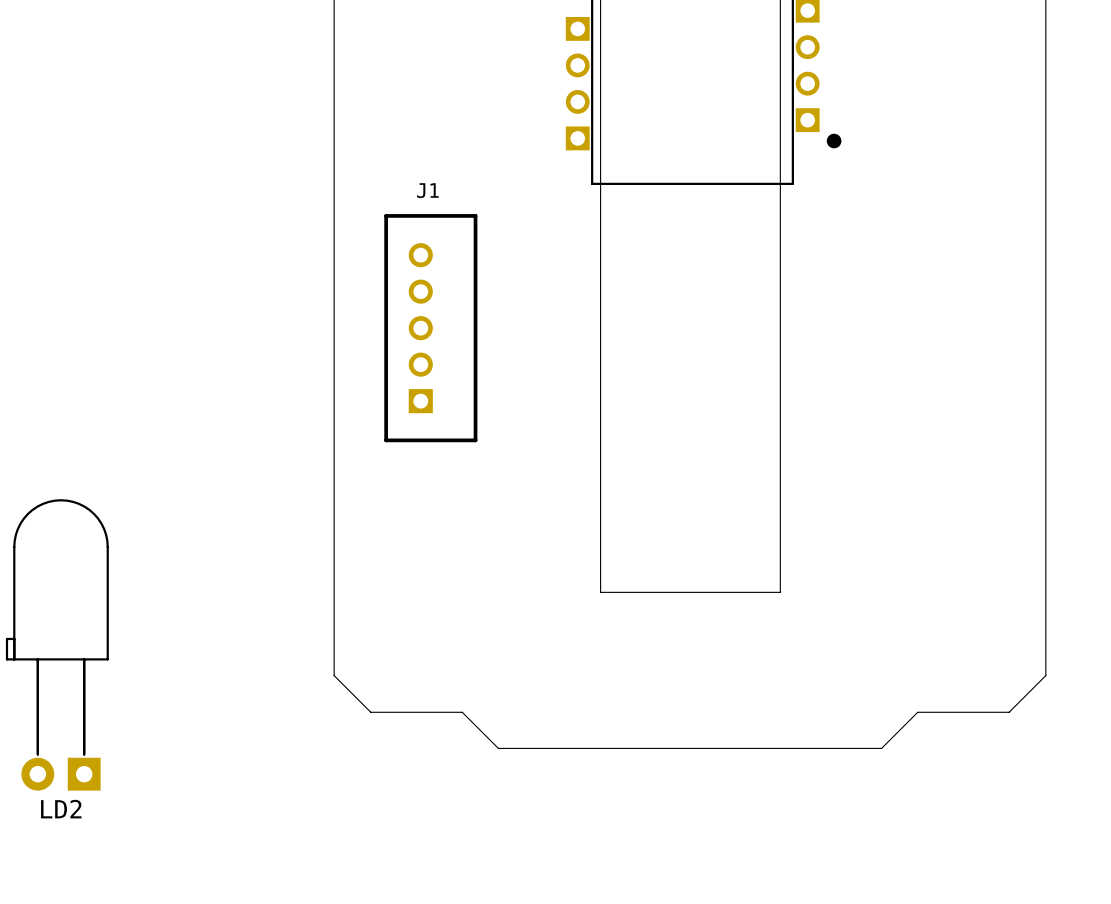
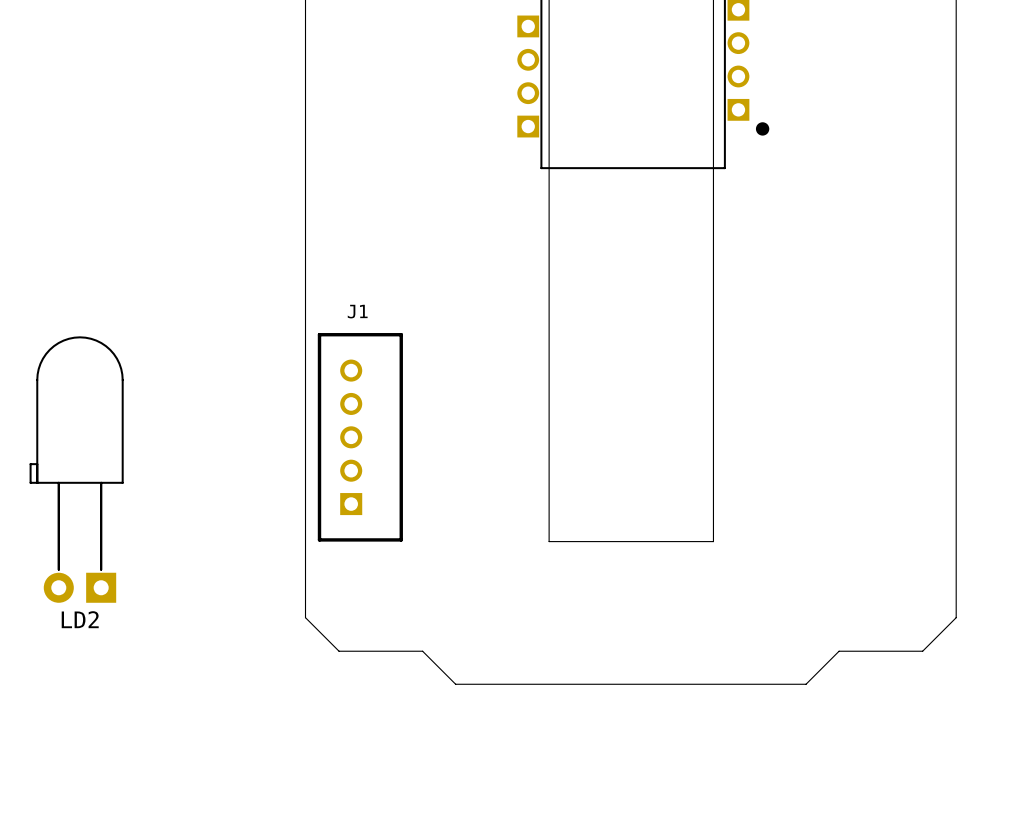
J1 position: (430, 328) -> (360, 437)
LD2 position: (57, 644) -> (76, 469)

